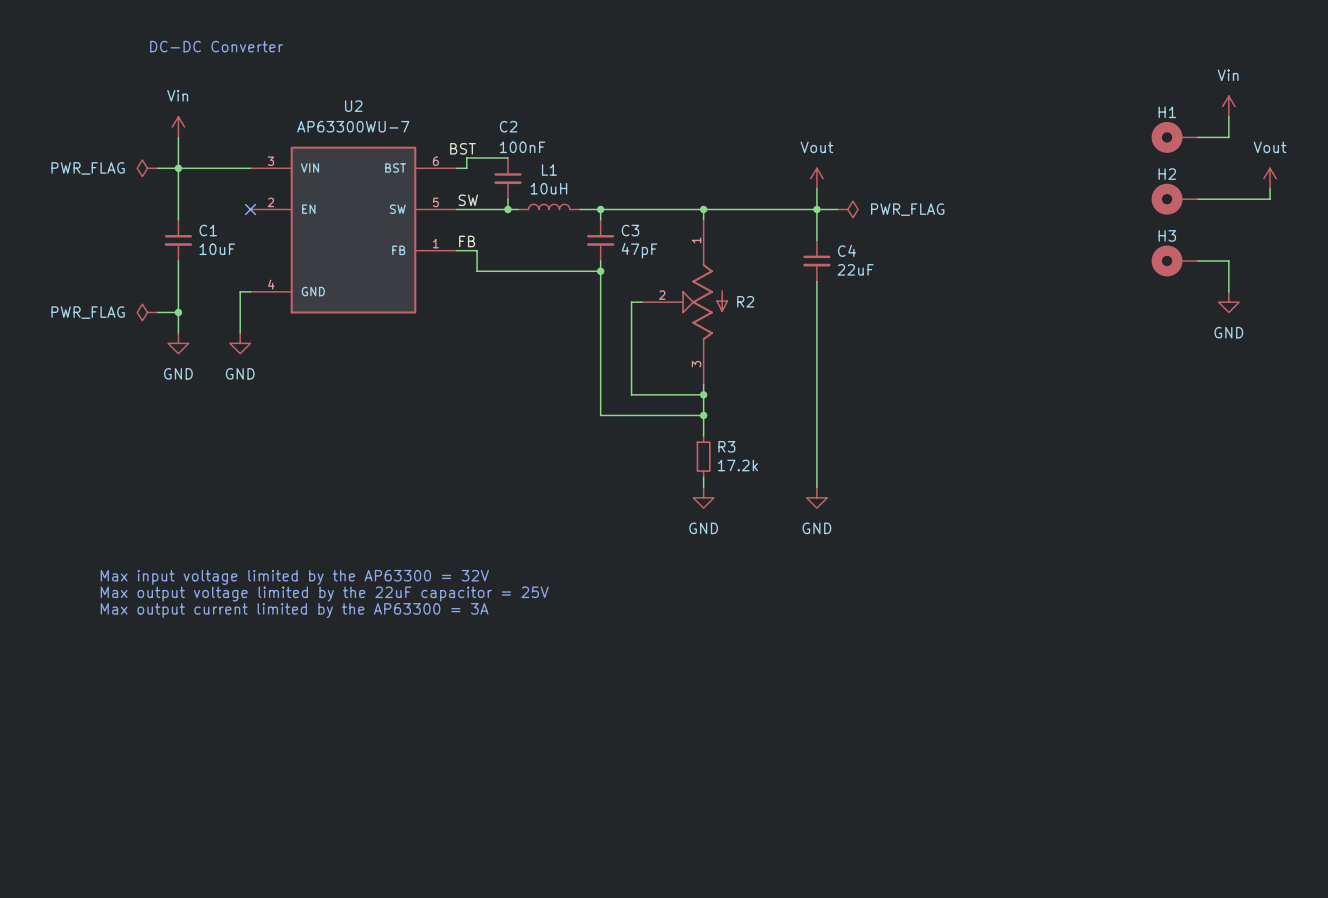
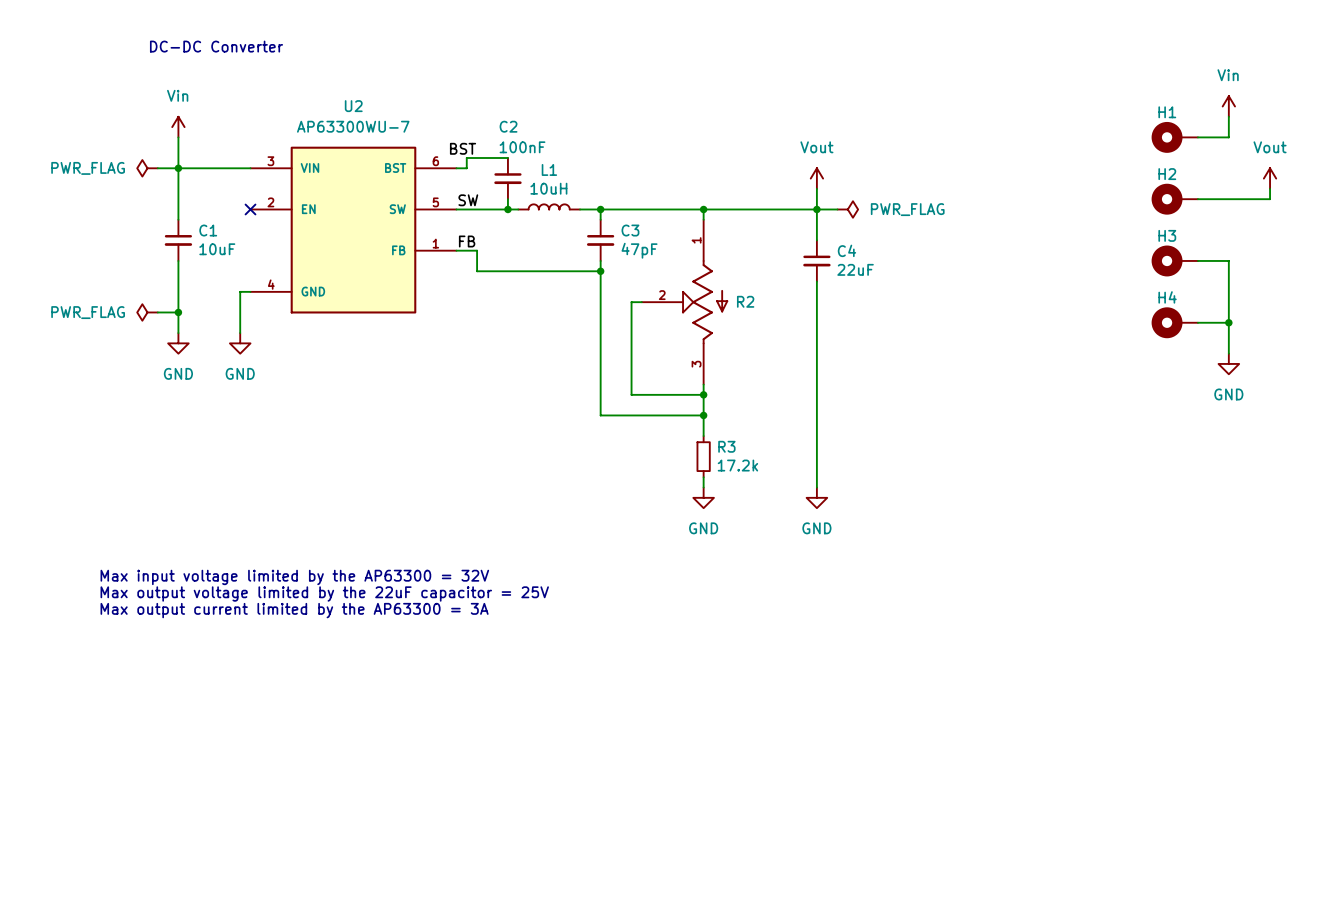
wire: none -> (1228, 291) (1228, 353)
power symbol position: GND (1228, 302) -> GND (1228, 363)
H4: none -> (1174, 322)
wire: none -> (1197, 322) (1228, 322)
junction: none -> (1228, 322)

